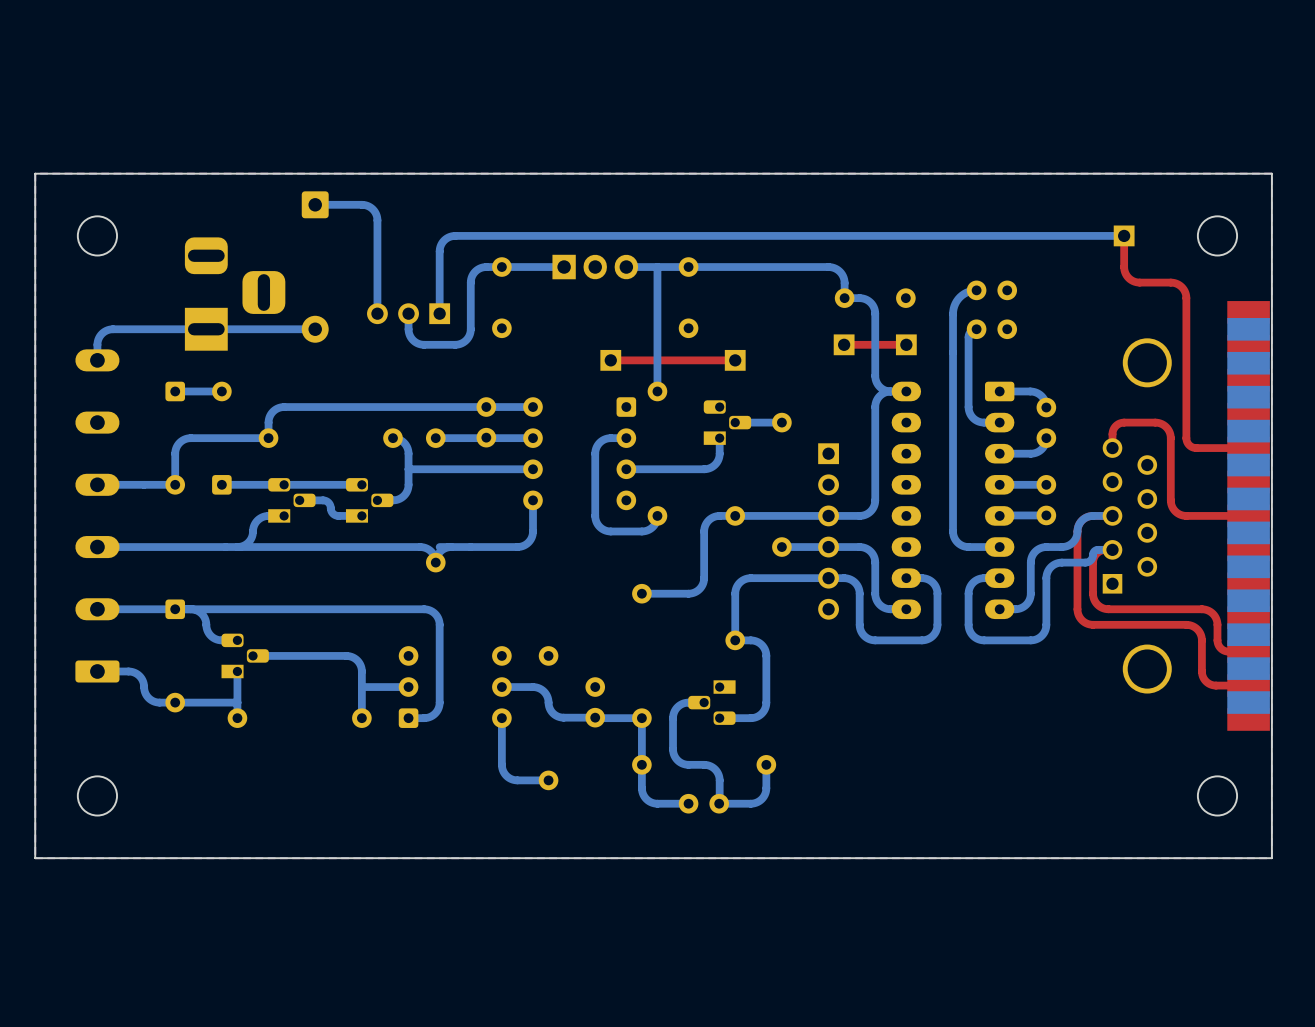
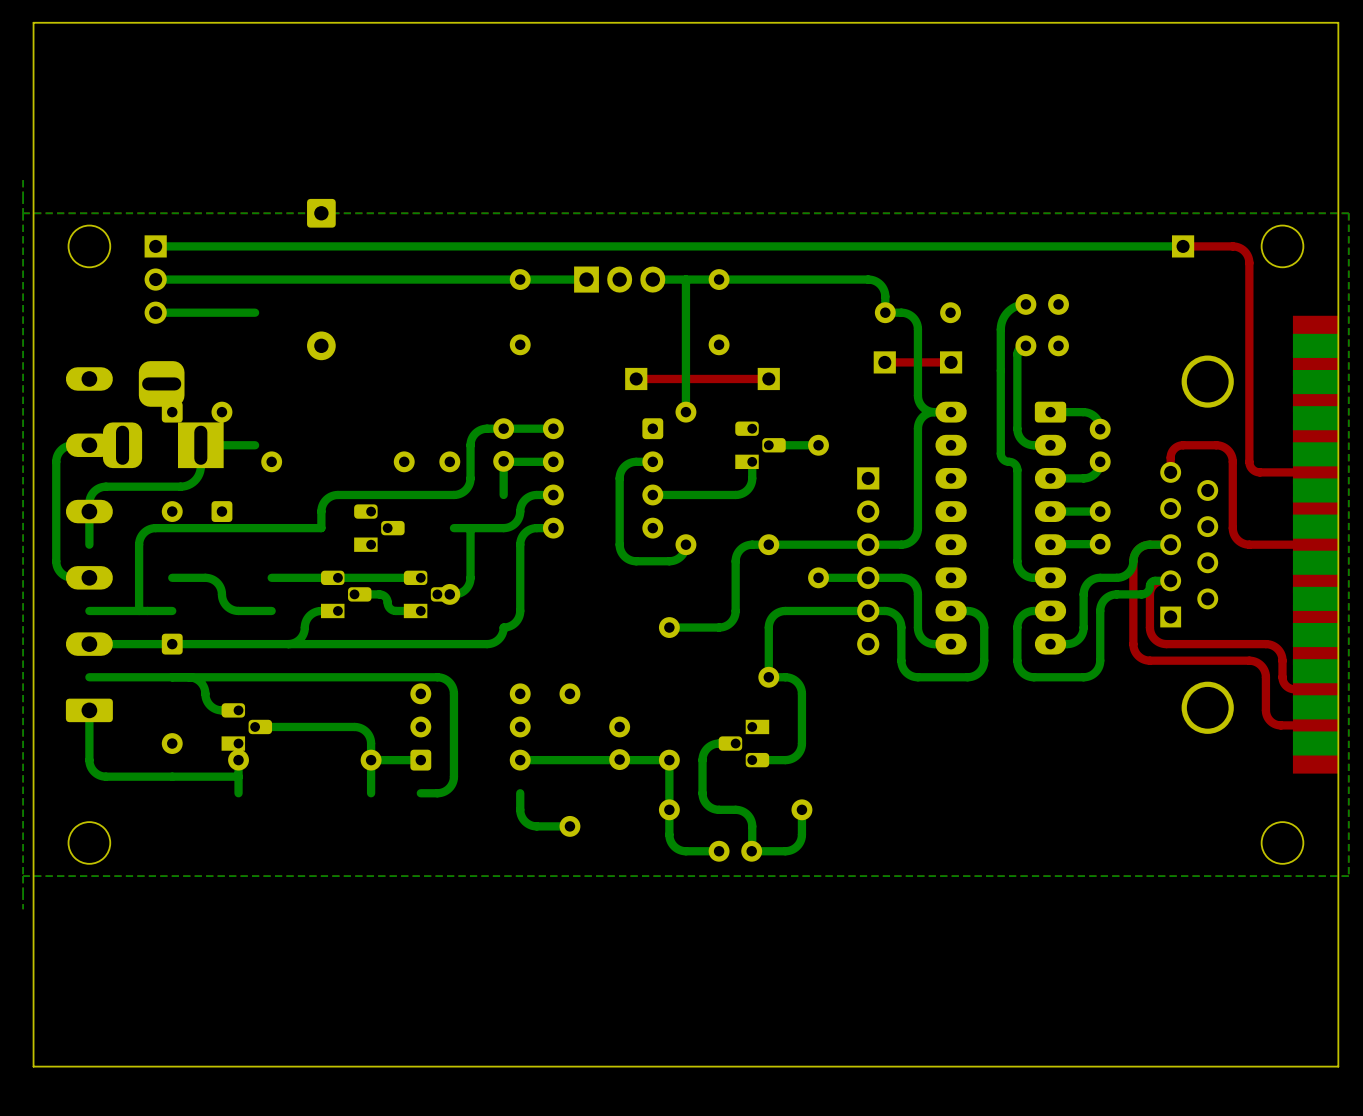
board edge: (1271, 173) (1271, 858) (35, 858) (35, 173) (1271, 173) -> (1338, 22) (1338, 1066) (33, 1066) (33, 22) (1338, 22)
bottom zone outline: none -> (23, 213) (1348, 213) (1348, 876) (23, 876)
bottom track: (315, 204) (363, 204) (370, 207) (375, 212) (377, 220) (377, 313) -> none
bottom track: (455, 235) (445, 239) (440, 248) (439, 313) -> (470, 246) (155, 246)
top track: (1124, 235) (1124, 268) (1128, 278) (1137, 282) (1175, 283) (1183, 289) (1186, 298) -> (1183, 246) (1234, 246) (1244, 251) (1249, 261) (1249, 312)
bottom track: (486, 267) (478, 269) (471, 277) (470, 331) (468, 337) (463, 342) (455, 344) (417, 343) (409, 334) (408, 313) -> (503, 279) (155, 279)
part rotation: 0° (235, 294) -> 90° counterclockwise (163, 414)
part position: (235, 294) -> (163, 414)
bottom track: none -> (255, 312) (155, 312)
part rotation: 0° (408, 313) -> 90° counterclockwise (155, 279)
part position: (408, 313) -> (155, 279)
bottom track: (315, 329) (111, 329) (103, 332) (98, 338) (97, 360) -> none
bottom track: (221, 391) (175, 391) -> none
bottom track: (470, 407) (280, 407) (273, 411) (269, 417) (268, 438) (190, 438) (181, 441) (175, 451) (175, 484) (97, 484) -> (487, 428) (478, 431) (472, 438) (469, 483) (464, 491) (453, 494)
bottom track: none -> (255, 445) (200, 445) (199, 474) (194, 480) (185, 486) (105, 486) (97, 489) (91, 494) (89, 501) (89, 544)
bottom track: (953, 430) (953, 534) (957, 542) (963, 546) (984, 547) -> (1000, 453) (1003, 459) (1013, 463) (1017, 469) (1017, 564) (1023, 574) (1033, 577)
bottom track: (486, 437) (435, 438) -> (503, 461) (503, 494)
bottom track: (393, 438) (402, 441) (407, 448) (408, 488) (404, 495) (398, 499) (377, 500) -> none
bottom track: (517, 469) (439, 469) -> (536, 494) (529, 496) (523, 501) (517, 520) (509, 527) (453, 528)
bottom track: (361, 484) (221, 484) -> none
part: (291, 500) -> none
bottom track: none -> (304, 528) (155, 528) (148, 529) (142, 534) (139, 542) (139, 610)
bottom track: (315, 500) (327, 502) (331, 512) (335, 515) (361, 515) -> (321, 528) (322, 506) (326, 499) (332, 495) (420, 494)
bottom track: none -> (470, 528) (468, 585) (459, 593) (437, 594)
bottom track: (533, 500) (532, 534) (529, 541) (524, 545) (439, 547) -> (553, 528) (531, 529) (525, 532) (521, 539) (520, 612) (515, 622) (503, 627) (500, 637) (490, 643) (437, 644)
bottom track: (284, 515) (266, 516) (260, 518) (254, 524) (249, 541) (244, 545) (237, 547) -> (337, 610) (319, 611) (312, 613) (306, 620) (301, 637) (295, 642) (288, 644)
bottom track: (175, 547) (97, 547) -> (122, 445) (69, 445) (61, 450) (56, 458) (56, 564) (59, 571) (67, 576) (89, 577)
bottom track: (268, 547) (206, 547) -> (271, 610) (231, 609) (223, 601) (218, 584) (212, 579) (205, 577)
bottom track: (451, 547) (440, 551) (435, 562) (433, 554) (428, 549) (408, 547) -> none
part: none -> (346, 594)
bottom track: none -> (354, 594) (382, 594) (386, 598) (389, 607) (394, 610) (420, 610)
part: none -> (429, 594)
bottom track: none -> (172, 610) (89, 610)
bottom track: (190, 609) (197, 610) (202, 615) (210, 635) (221, 640) -> (89, 677) (221, 677)
bottom track: (424, 609) (433, 612) (438, 619) (439, 655) -> (238, 677) (439, 677) (450, 683) (453, 693)
bottom track: none -> (188, 677) (196, 678) (201, 683) (207, 701) (213, 707) (220, 710) (238, 710)
part position: (245, 655) -> (246, 726)
bottom track: (252, 655) (353, 657) (358, 661) (361, 668) (361, 702) -> (255, 726) (356, 727) (366, 731) (371, 743)
bottom track: (237, 671) (237, 702) (156, 702) (147, 696) (142, 680) (135, 673) (97, 671) -> (238, 776) (105, 776) (98, 775) (93, 770) (89, 761) (89, 710)
bottom track: (408, 687) (361, 687) -> none
bottom track: (501, 687) (539, 688) (547, 695) (551, 711) (559, 717) (595, 717) -> none
bottom track: (439, 702) (437, 710) (430, 716) (408, 718) -> (453, 743) (453, 778) (451, 785) (441, 792) (420, 793)
bottom track: none -> (238, 760) (238, 793)
bottom track: none -> (420, 760) (371, 760) (371, 793)
bottom track: (501, 718) (501, 749) -> (520, 760) (619, 760)

